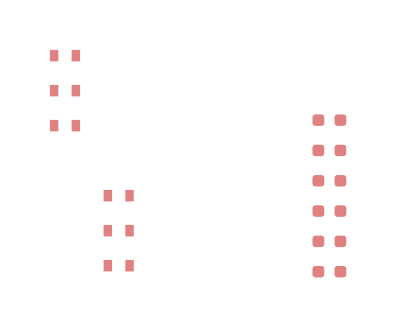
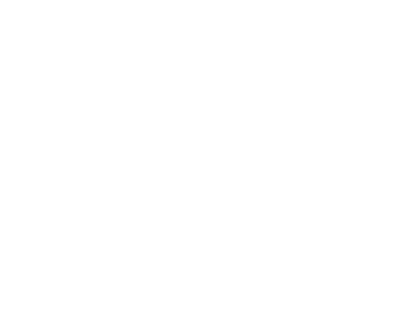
part: (64, 55) -> none
part: (64, 90) -> none
part: (329, 120) -> none
part: (64, 125) -> none
part: (329, 150) -> none
part: (329, 180) -> none
part: (118, 195) -> none
part: (329, 211) -> none
part: (118, 230) -> none
part: (329, 241) -> none
part: (118, 265) -> none
part: (329, 271) -> none

